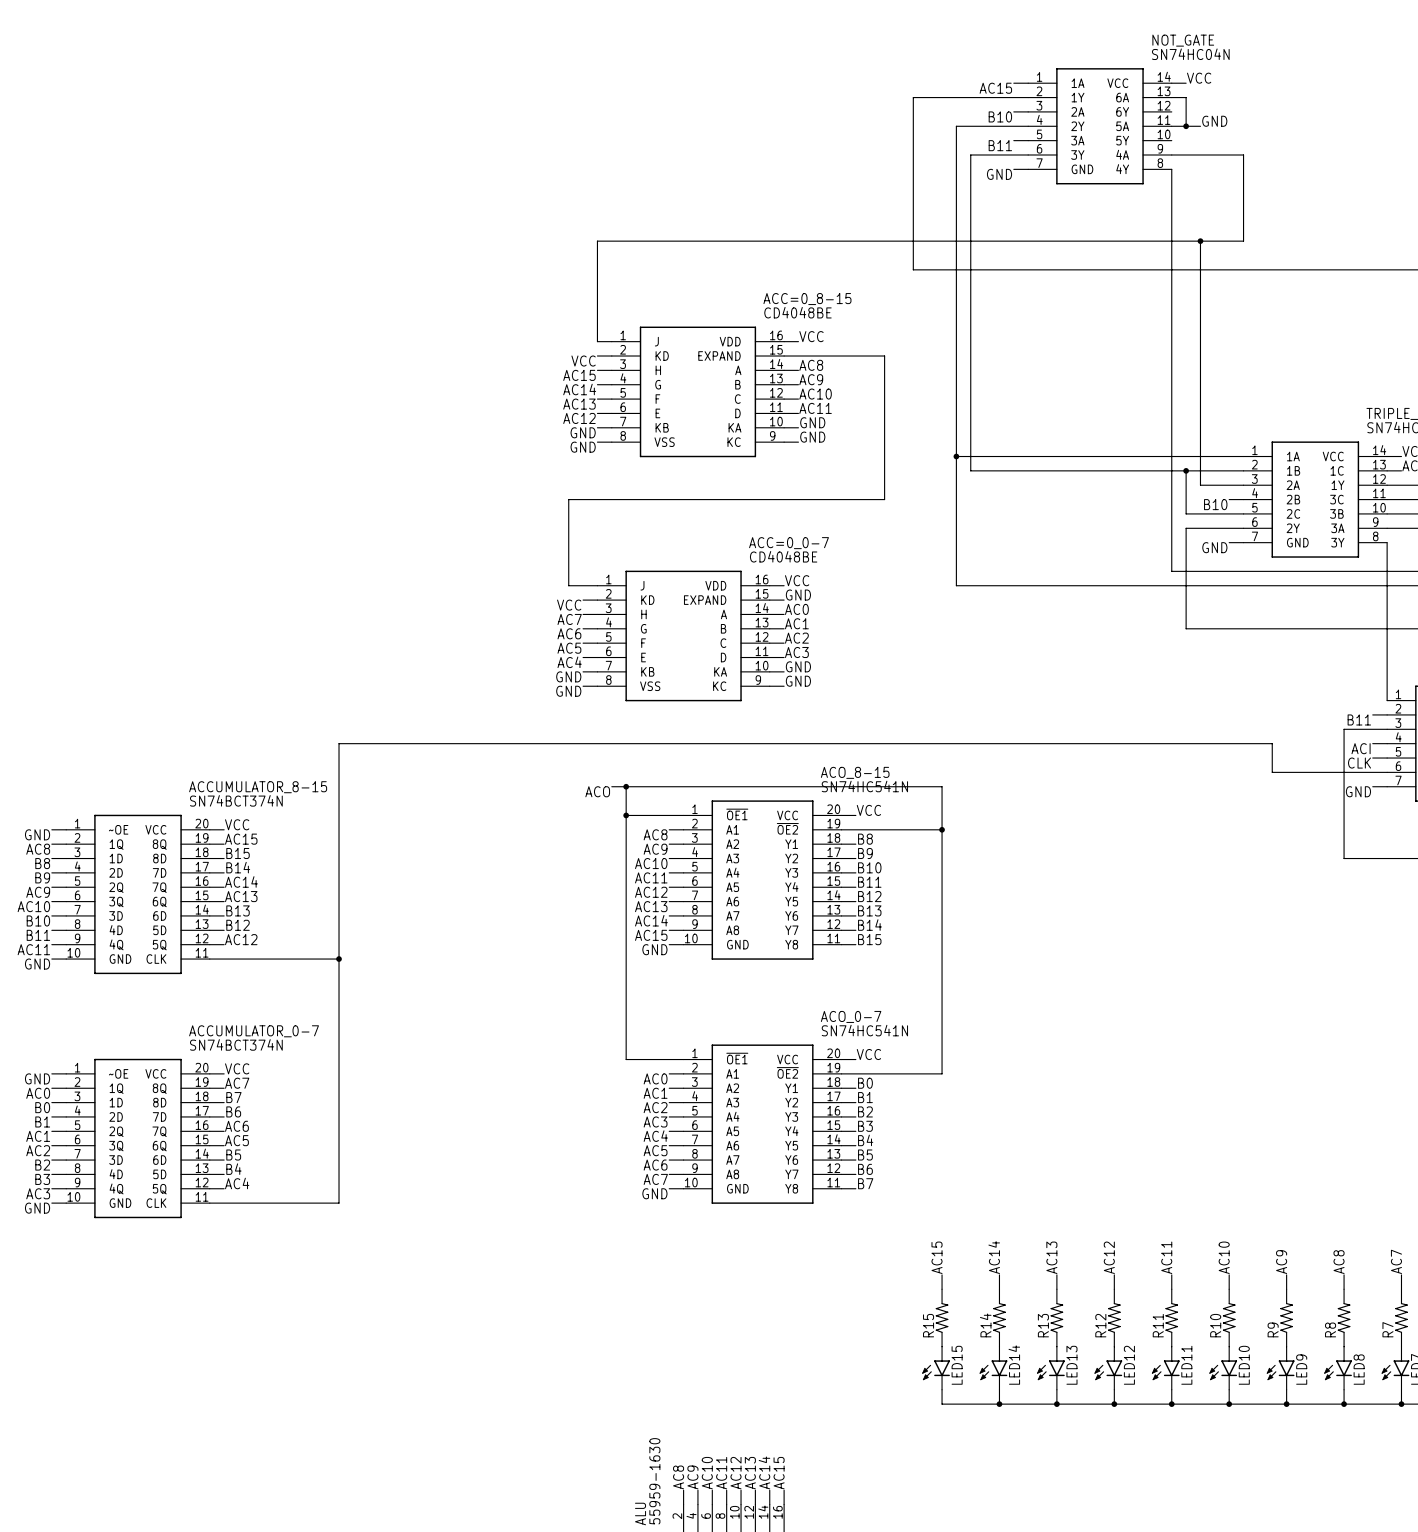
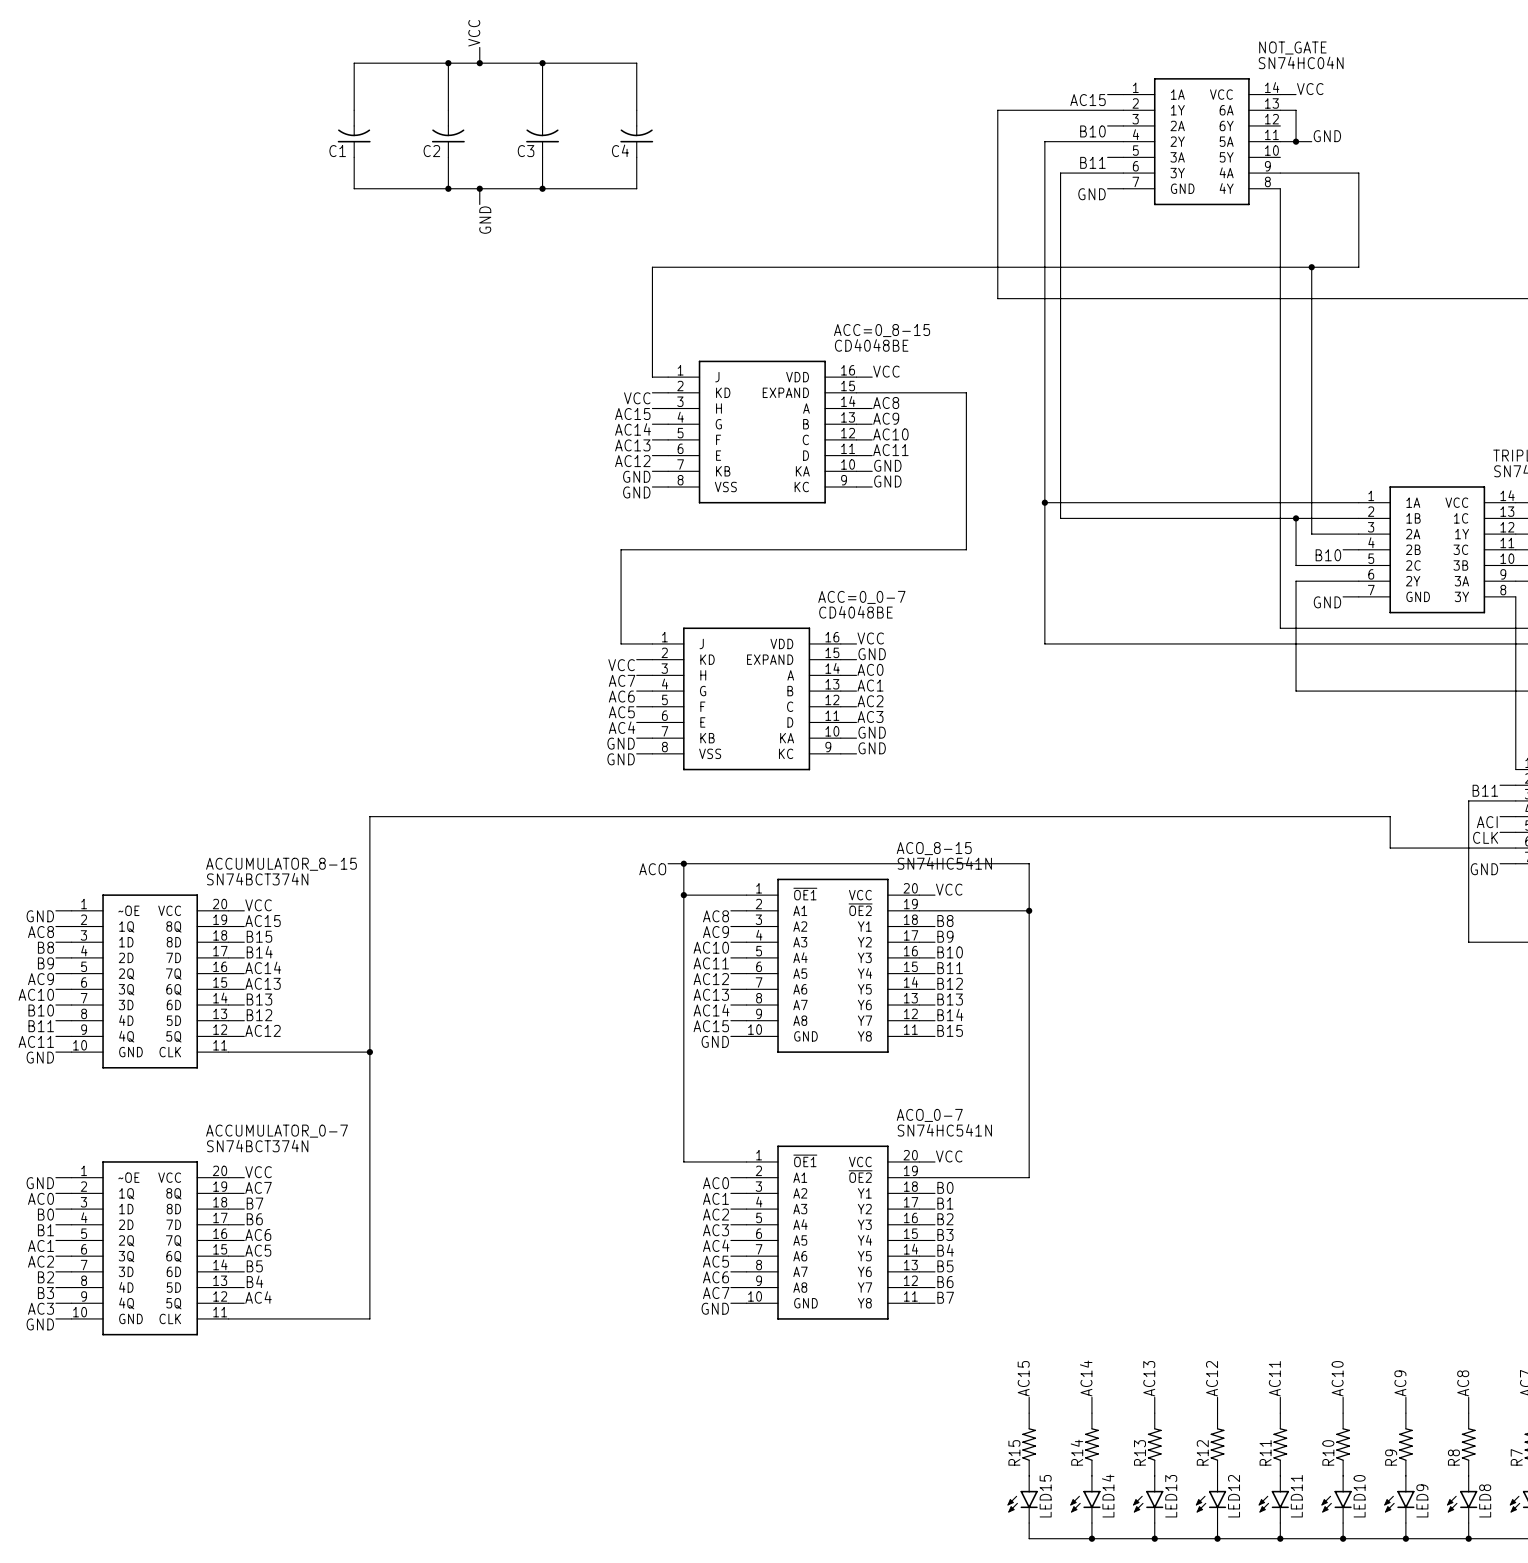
label: none -> VCC (474, 33)
wire: none -> (479, 47) (479, 63)
wire: none -> (448, 63) (448, 110)
junction: none -> (448, 63)
junction: none -> (479, 63)
wire: none -> (542, 63) (542, 110)
junction: none -> (542, 63)
wire: none -> (354, 110) (354, 63) (636, 63) (636, 110)
C1: none -> (354, 133)
C2: none -> (448, 133)
C3: none -> (542, 133)
C4: none -> (636, 133)
wire: none -> (354, 157) (354, 188) (636, 188) (636, 157)
wire: none -> (448, 157) (448, 188)
wire: none -> (542, 157) (542, 188)
junction: none -> (448, 188)
wire: none -> (479, 188) (479, 204)
junction: none -> (479, 188)
junction: none -> (542, 188)
label: none -> GND (485, 220)

